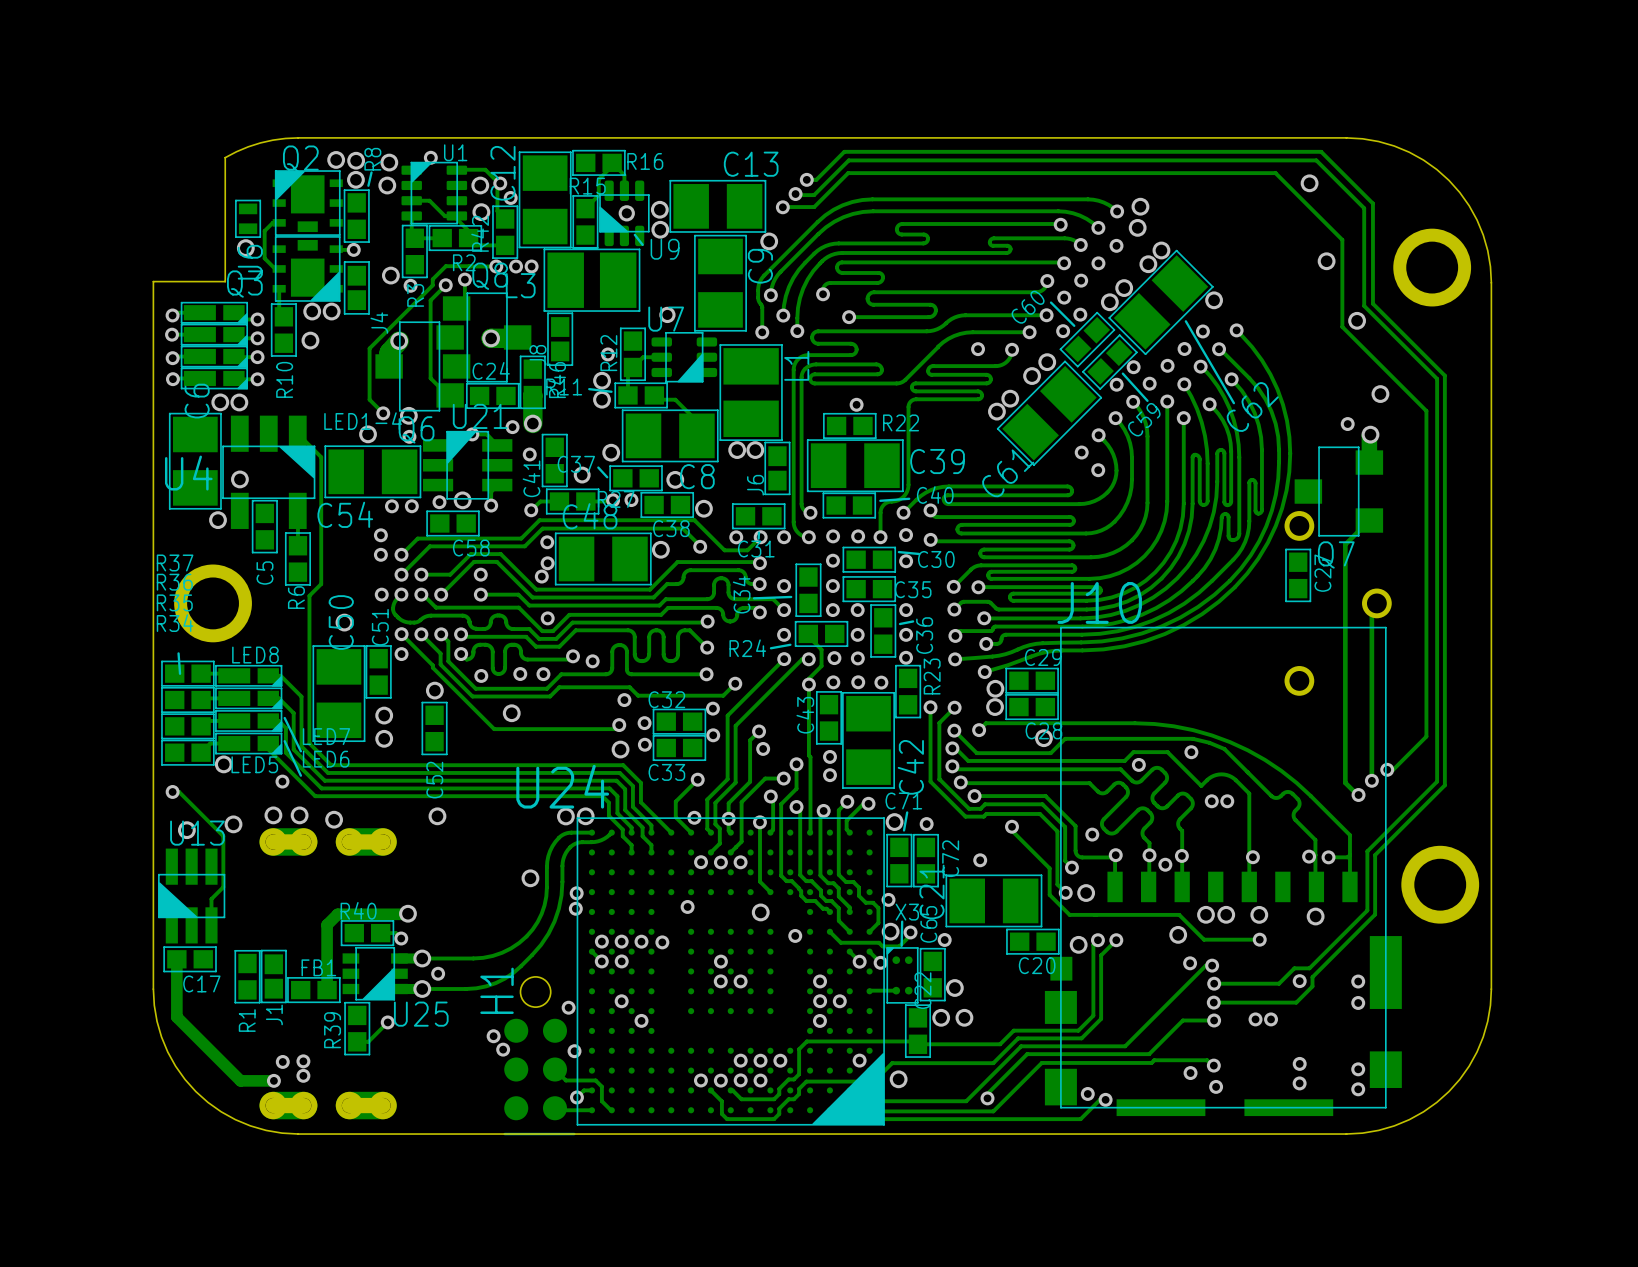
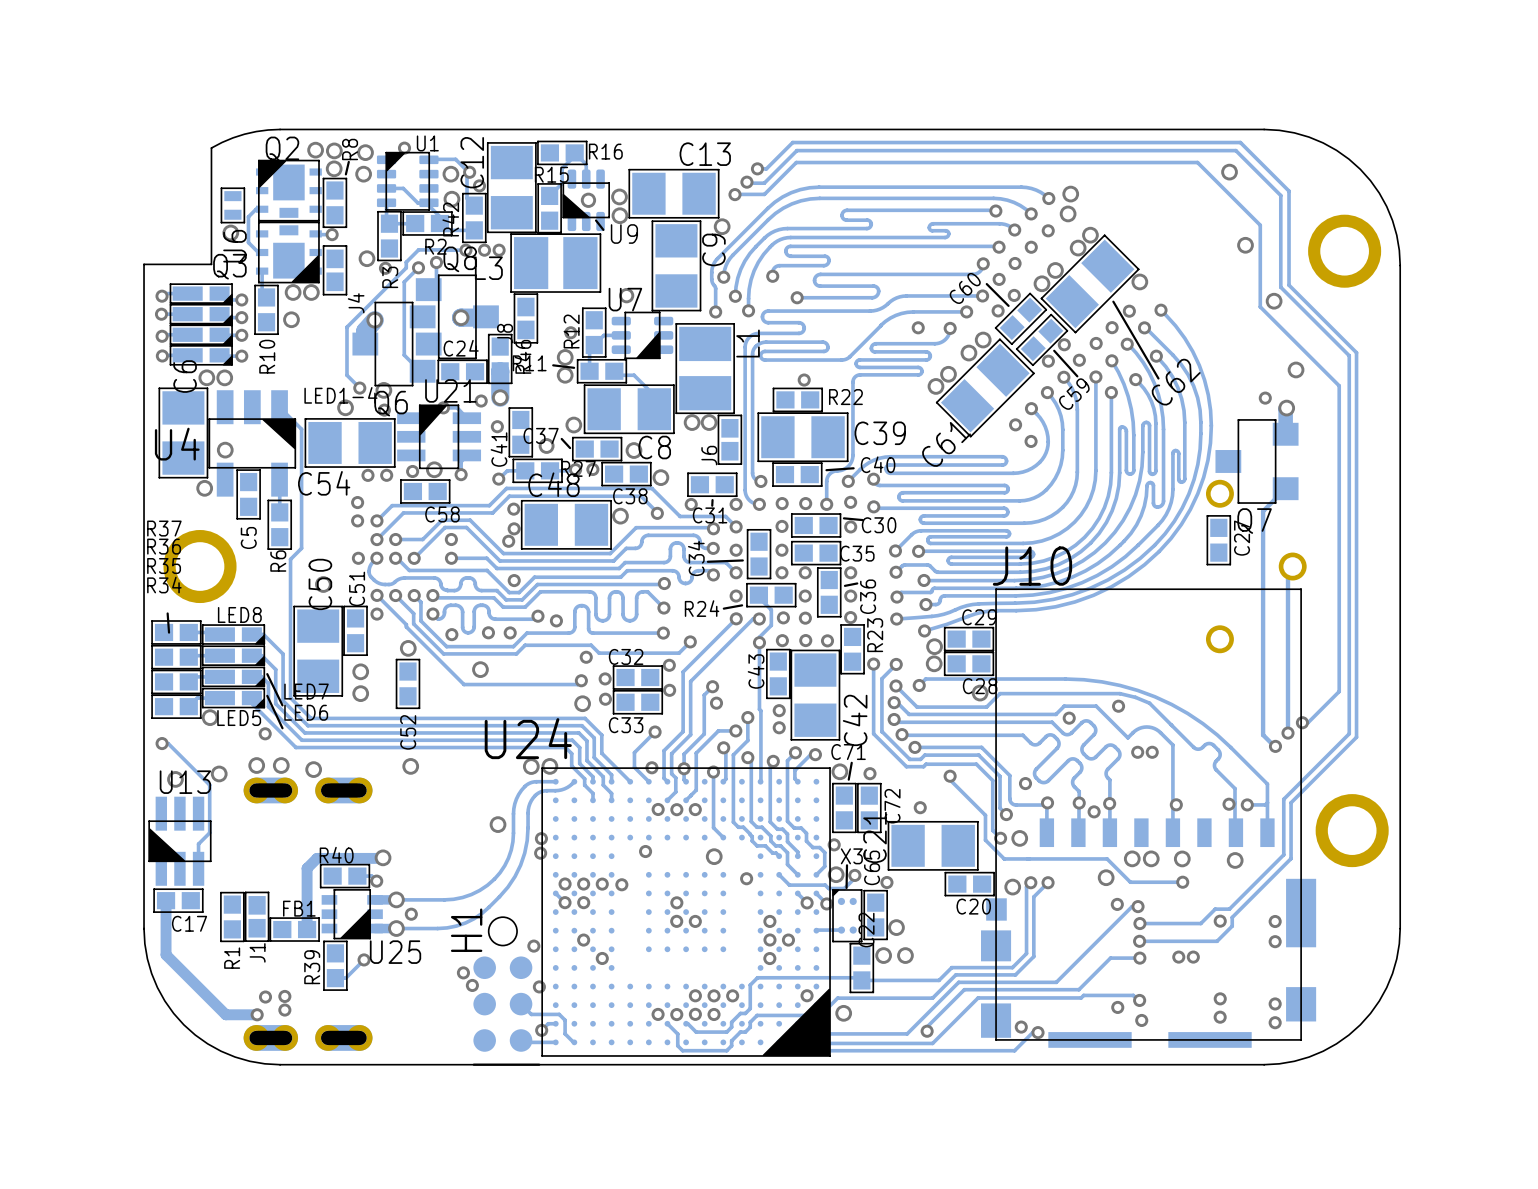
track: (760, 537) (747, 550) (724, 550) -> (736, 526) (725, 516) (680, 516)
via position: (760, 537) -> (736, 526)

